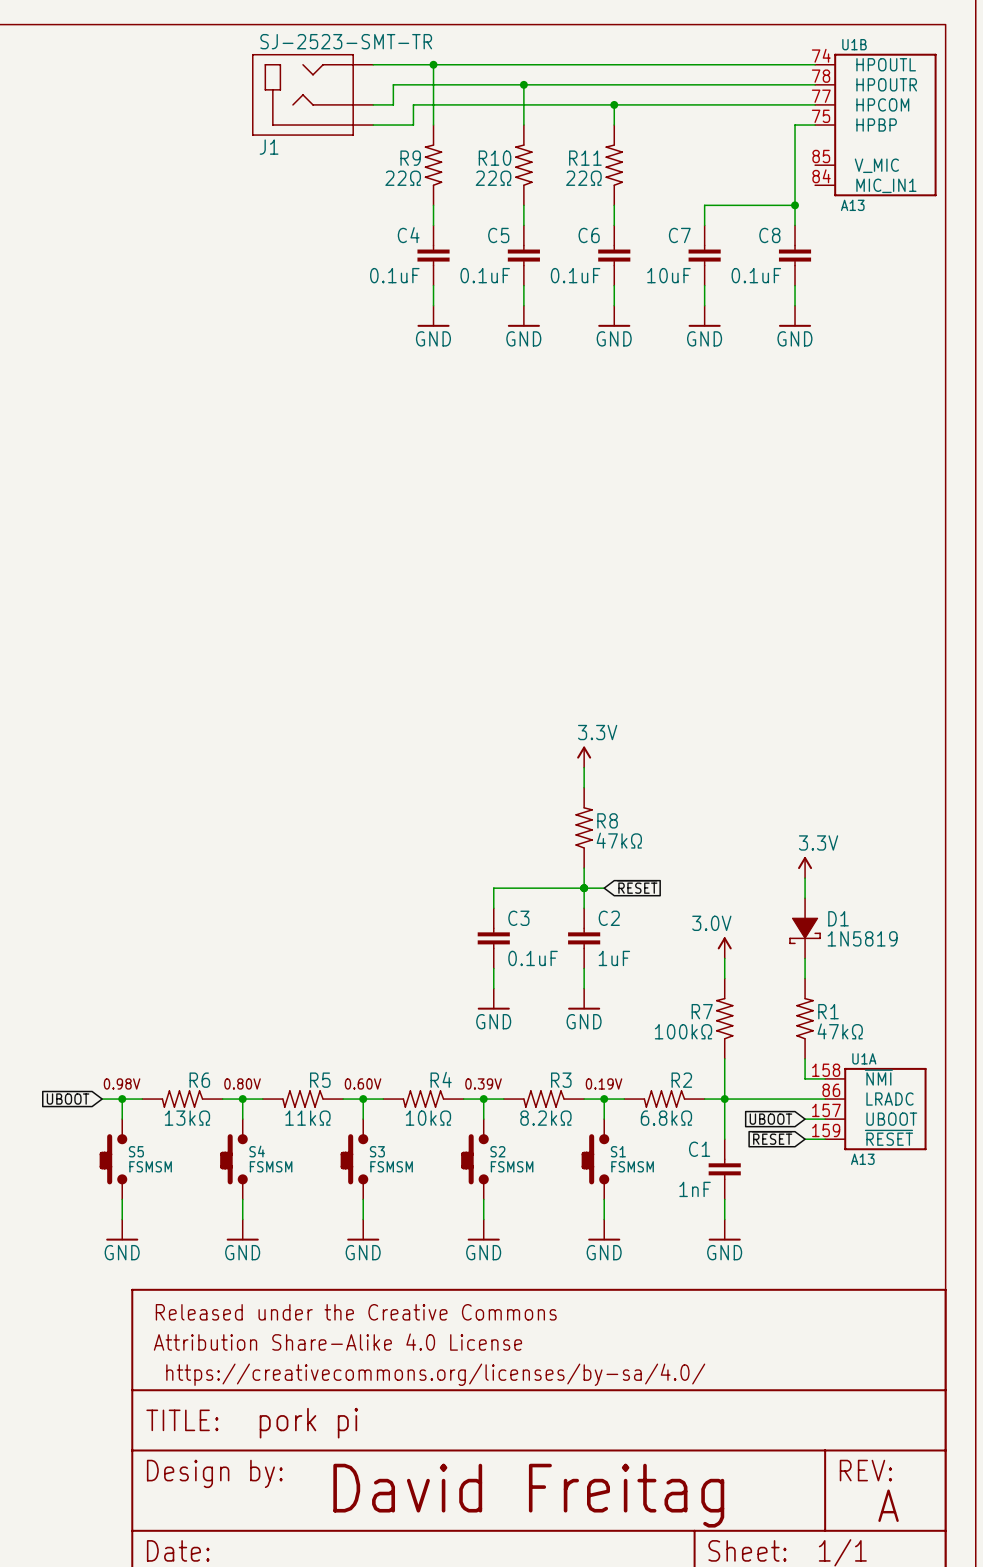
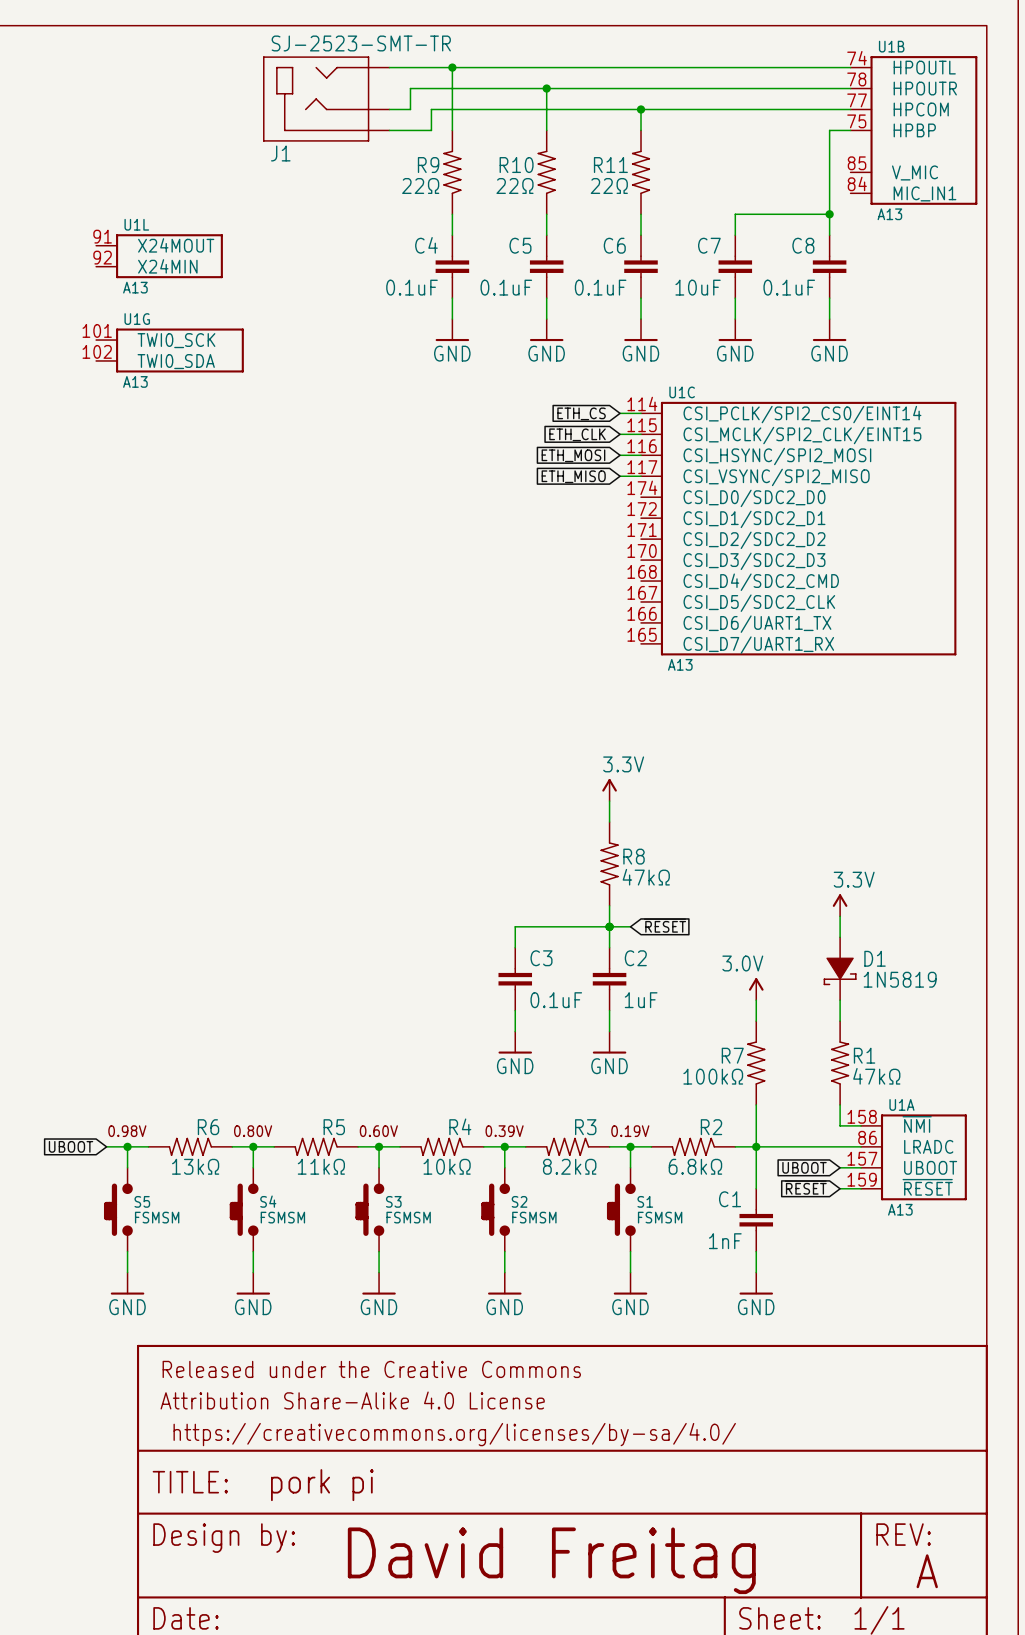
U1L: none -> A13 (159, 256)
U1G: none -> A13 (169, 350)
global label: none -> ETH_CS (581, 413)
wire: none -> (620, 413) (641, 413)
global label: none -> ETH_CLK (577, 434)
wire: none -> (620, 434) (641, 434)
global label: none -> ETH_MOSI (573, 455)
wire: none -> (620, 455) (641, 455)
global label: none -> ETH_MISO (573, 476)
wire: none -> (620, 476) (641, 476)
U1C: none -> A13 (798, 528)

